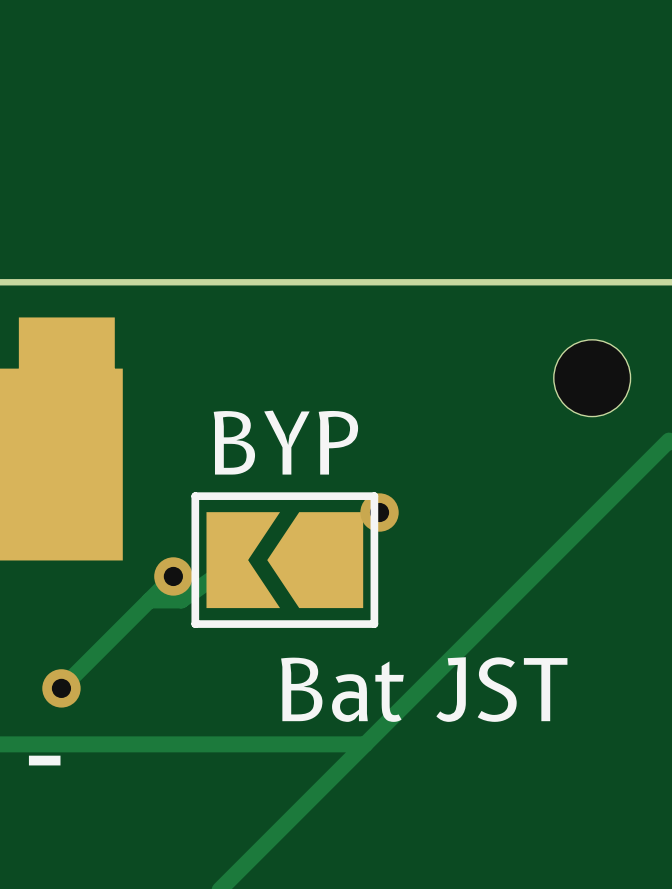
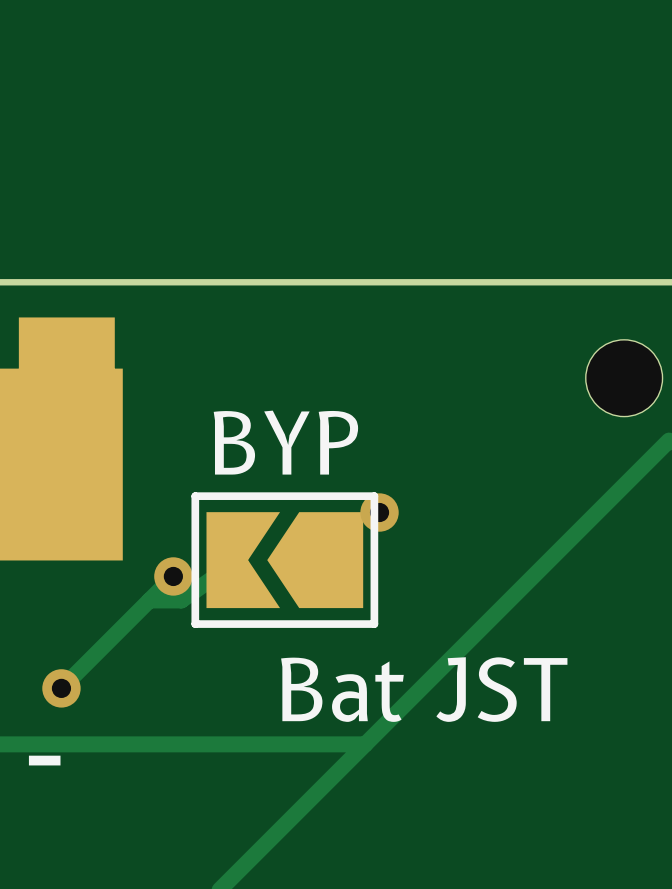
part position: (592, 378) -> (624, 378)

